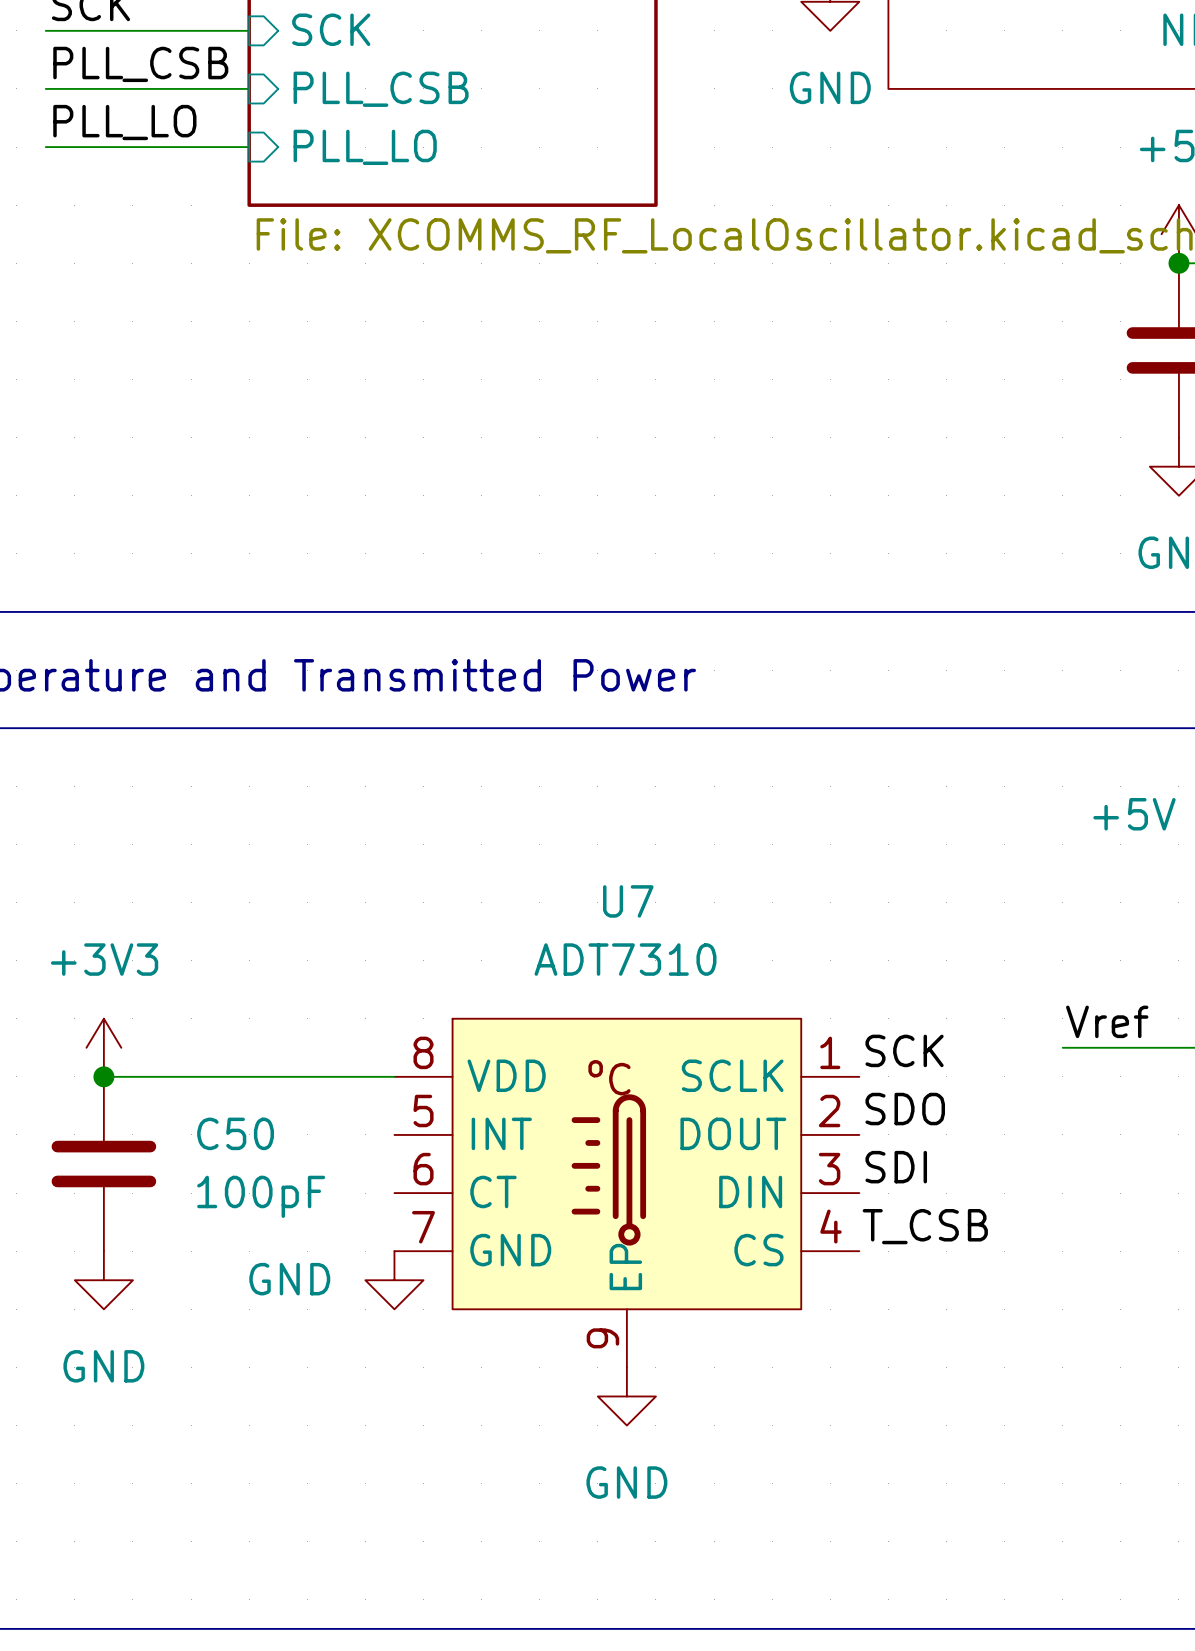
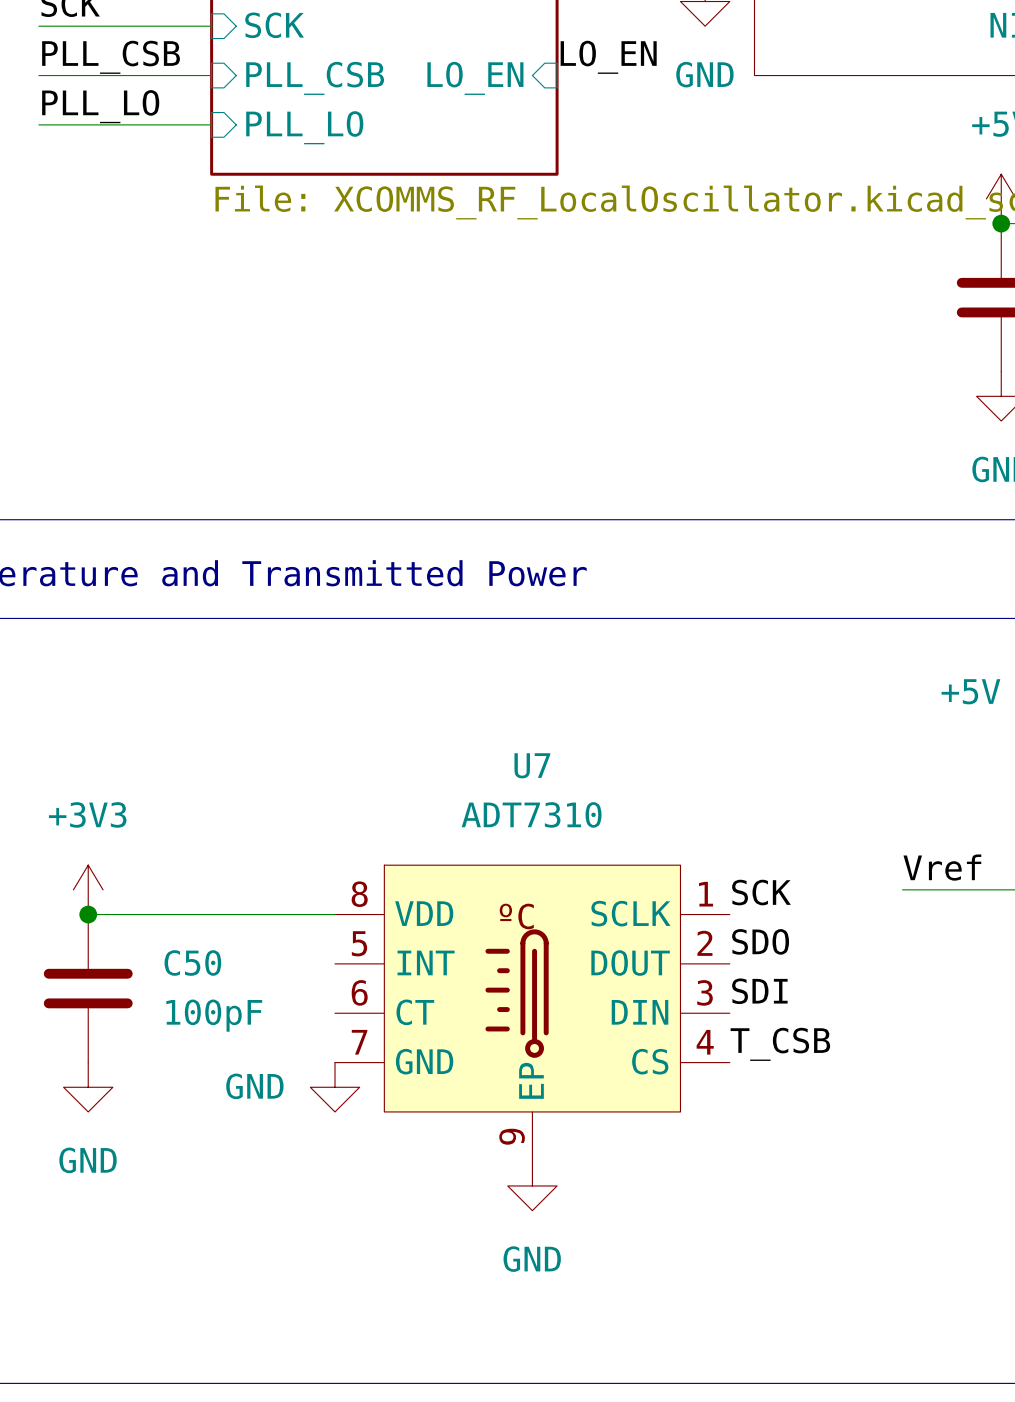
label: none -> LO_EN (608, 57)
sheet pin: none -> LO_EN (475, 78)

